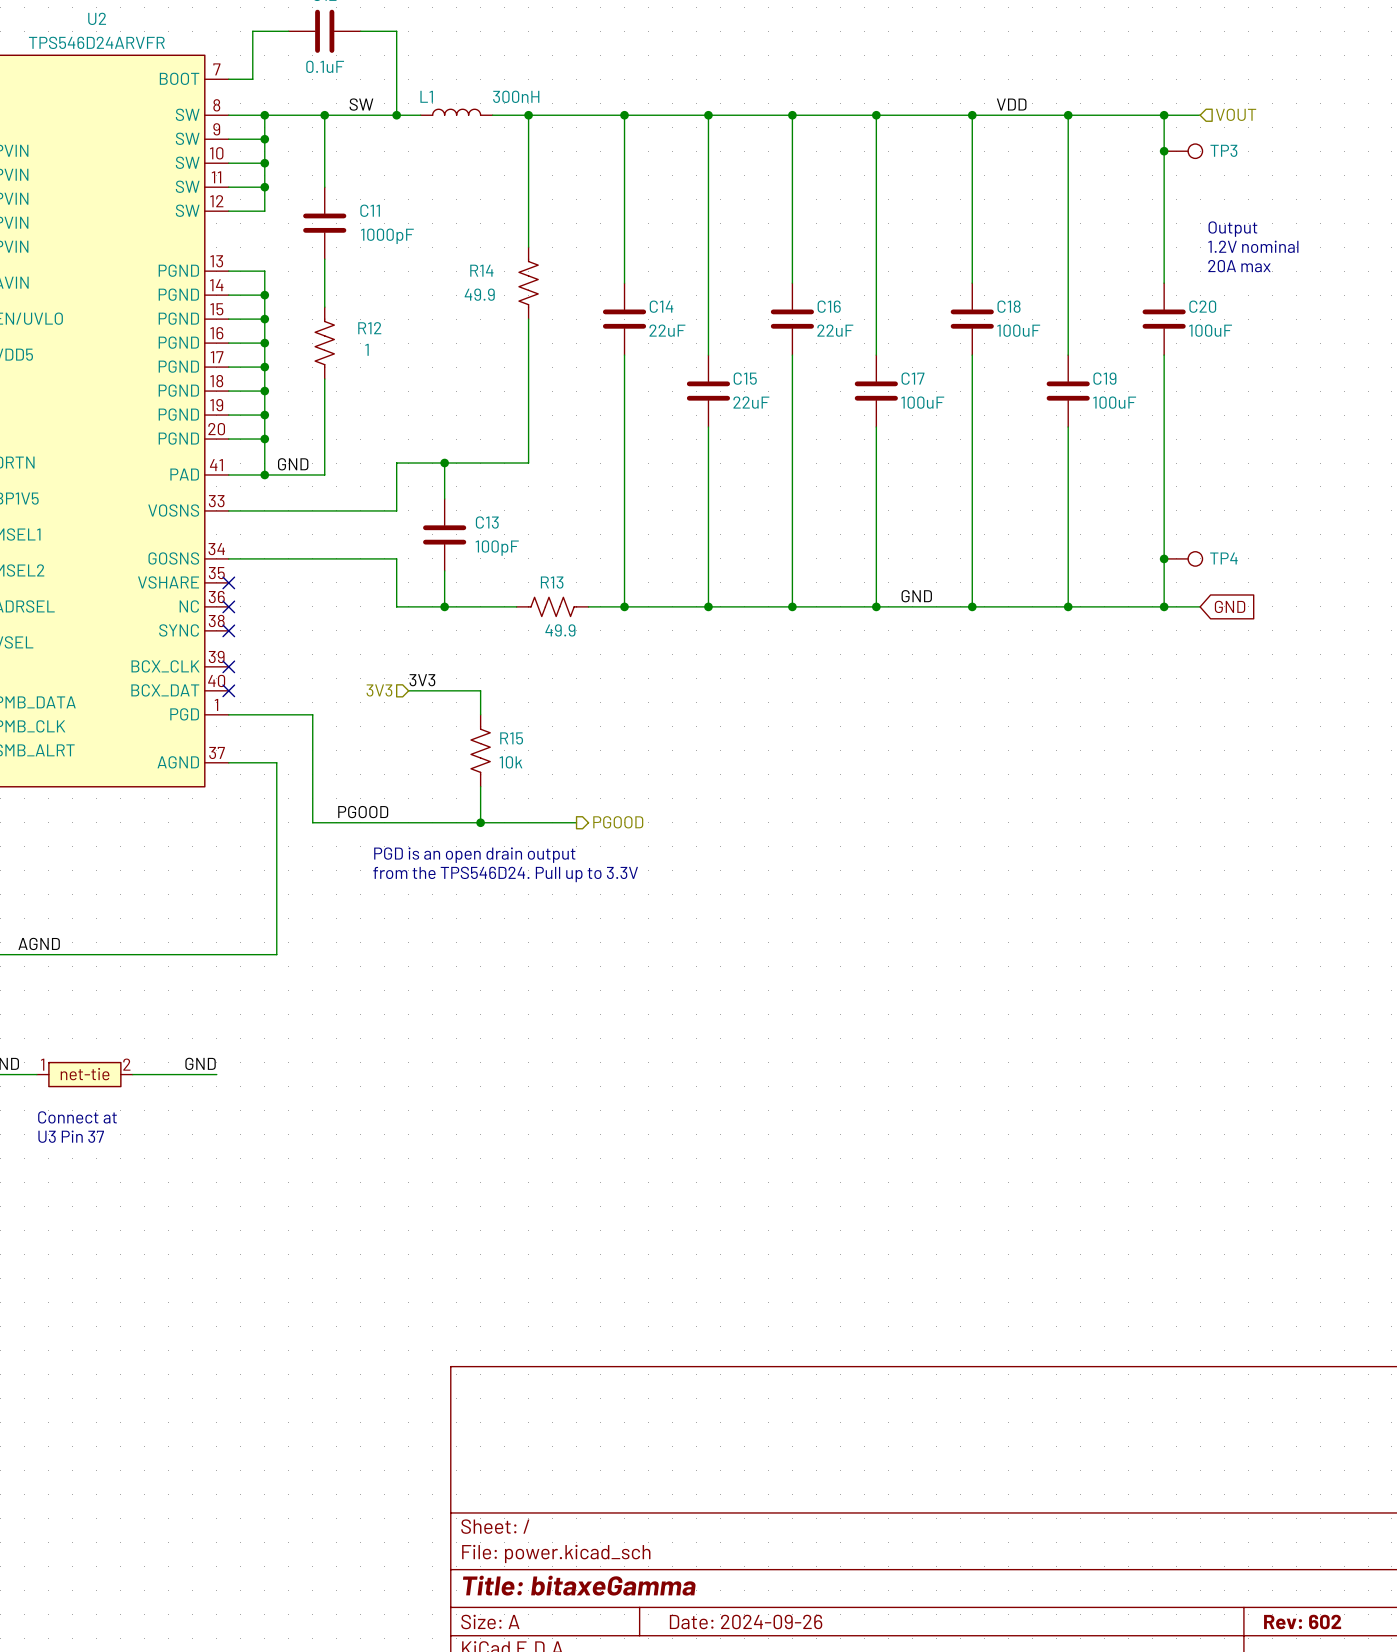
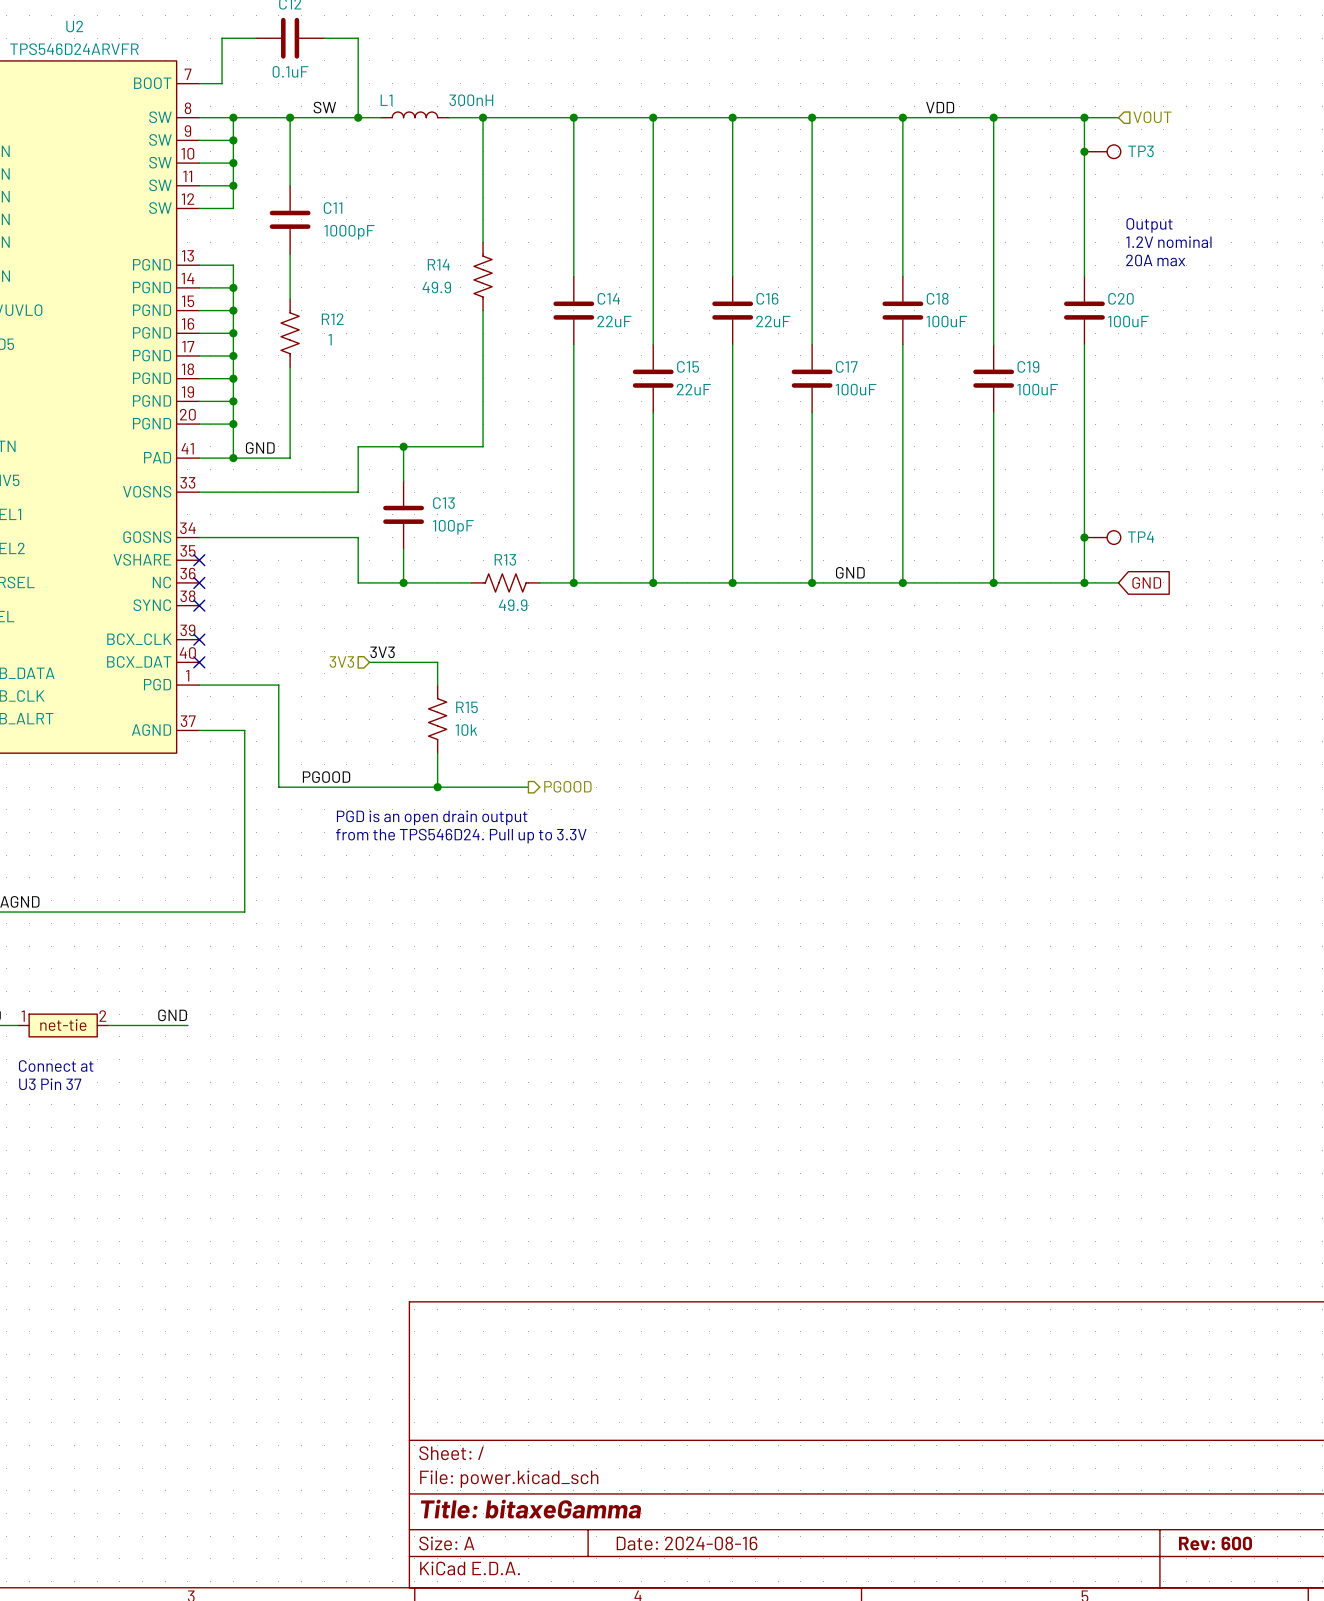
title block: Date: 2024-09-26 (746, 1621) -> Date: 2024-08-16 (687, 1543)
title block: Rev: 602 (1302, 1622) -> Rev: 600 (1215, 1543)

